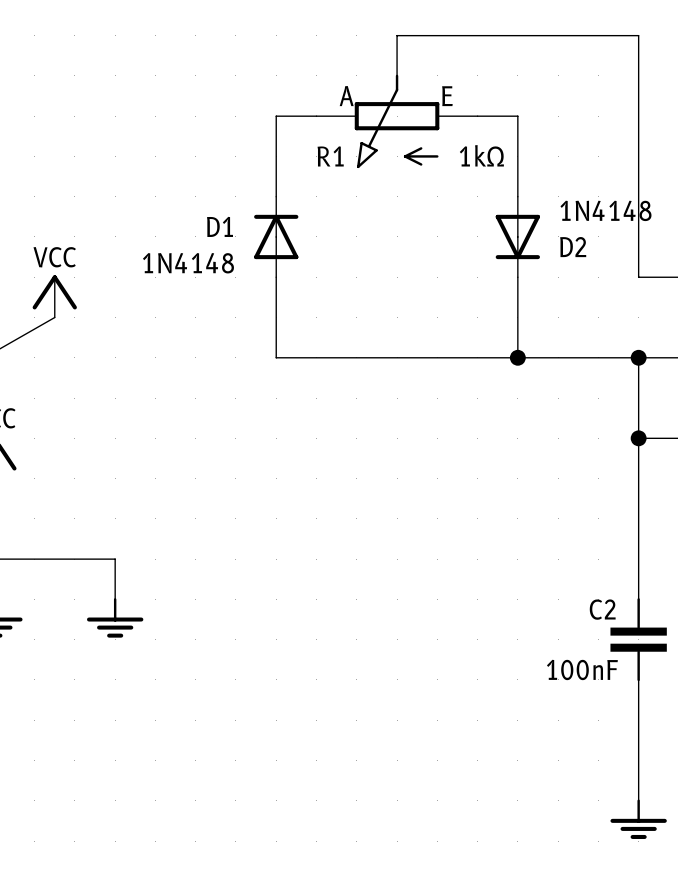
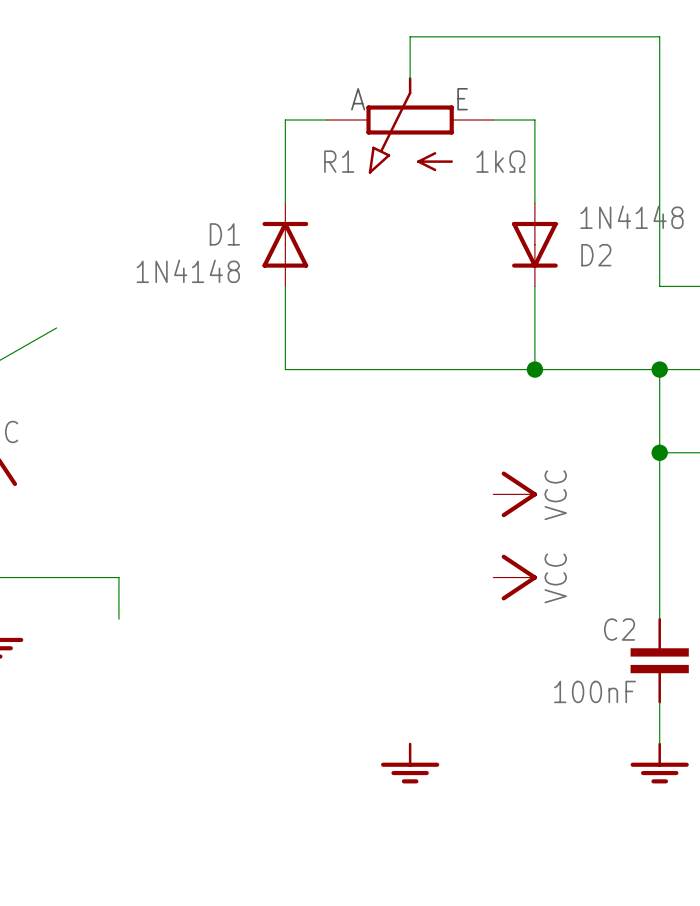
part: (54, 296) -> none
part: none -> (515, 494)
power symbol: none -> VCC (515, 577)
power symbol: (115, 617) -> none
wire: (638, 720) (638, 800) -> none
power symbol: none -> (410, 763)
power symbol position: (638, 819) -> (659, 763)

